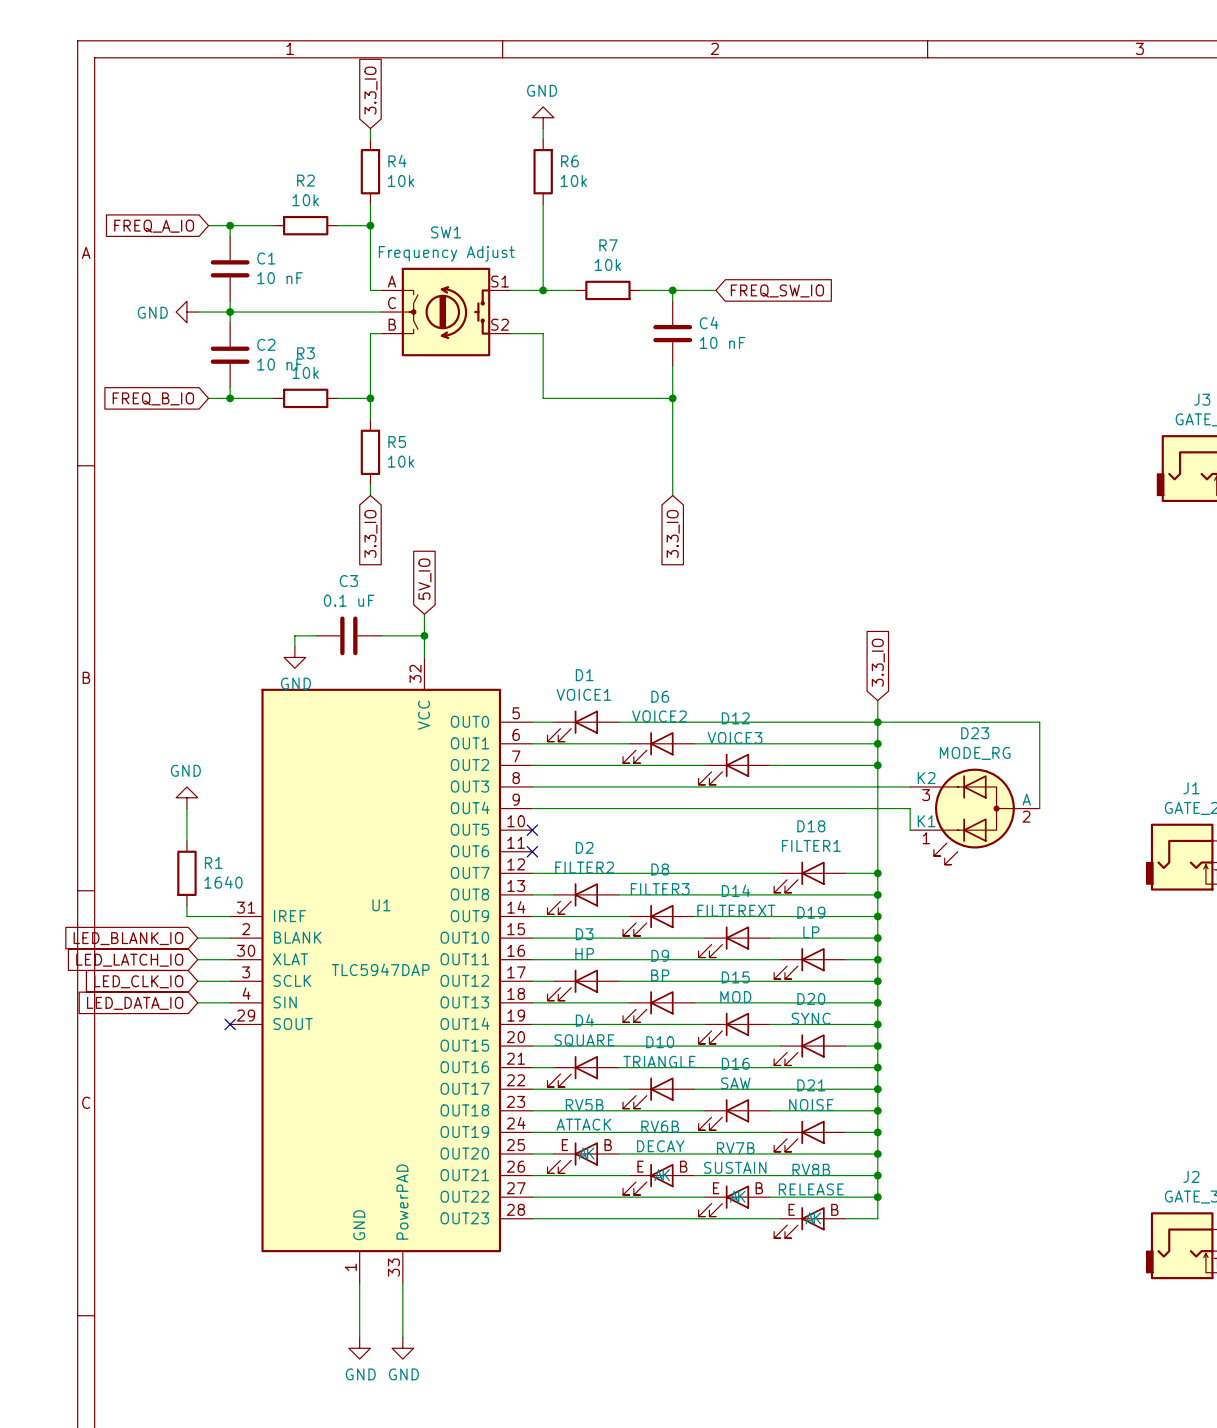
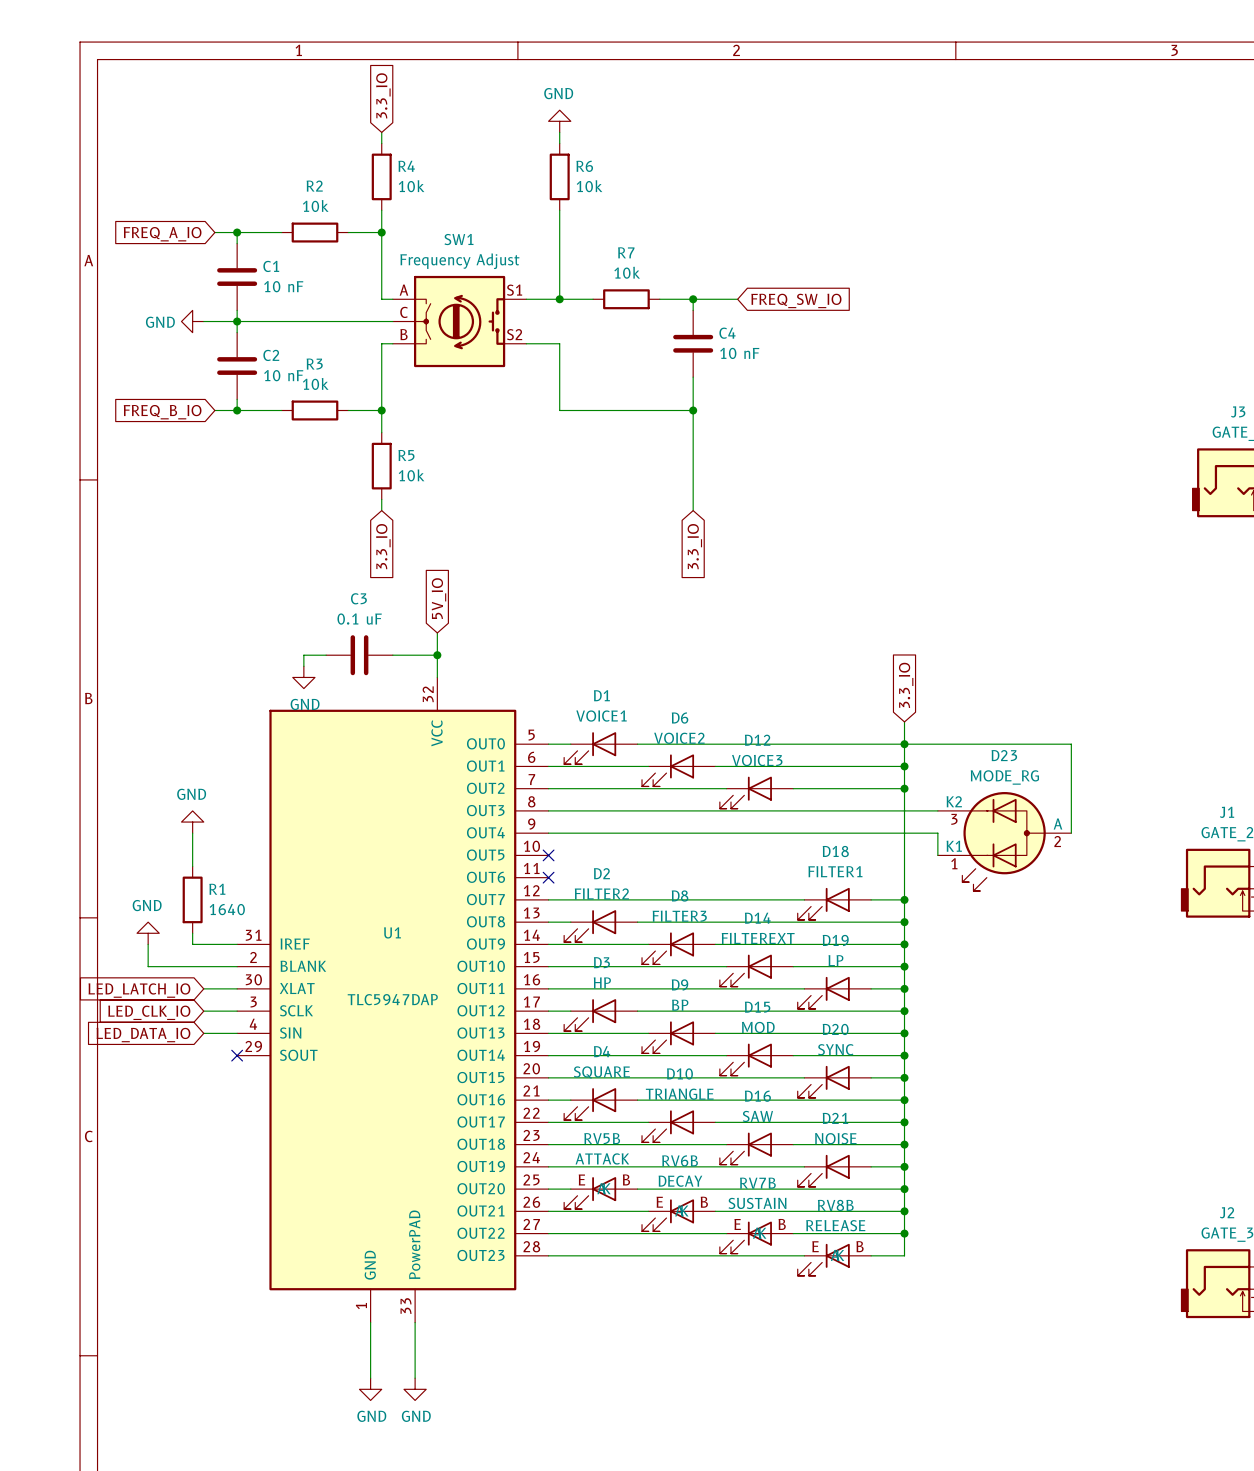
power symbol: none -> GND (148, 933)
wire: none -> (148, 944) (148, 966) (203, 966)
global label: LED_BLANK_IO (128, 938) -> none

